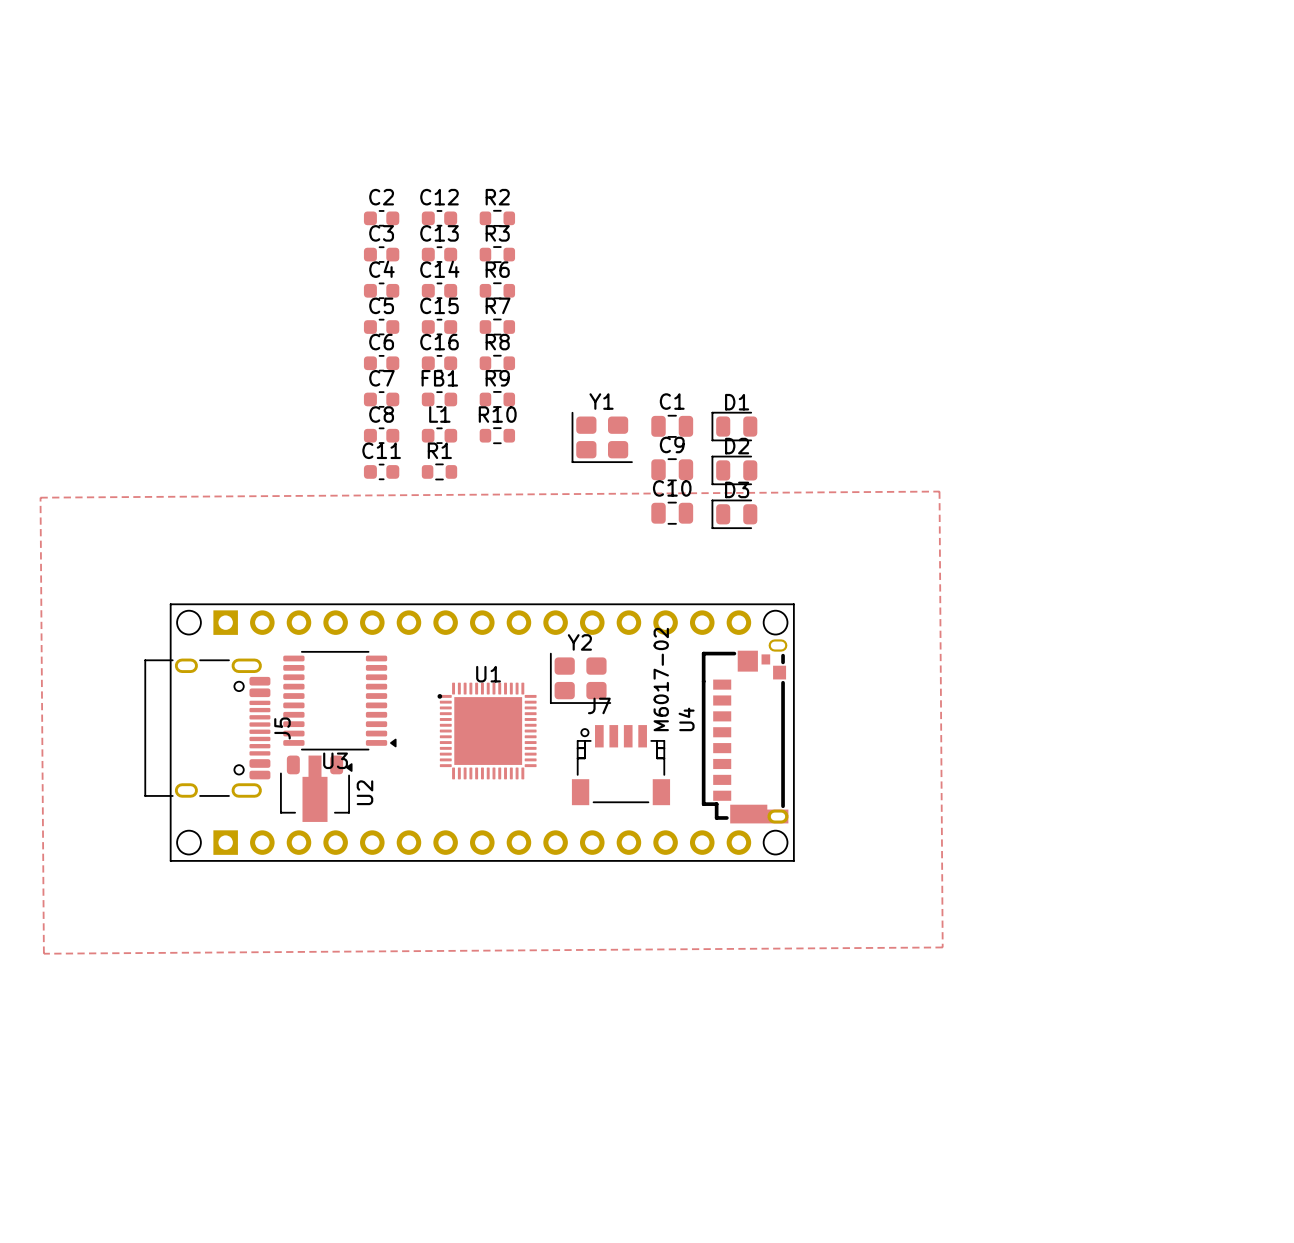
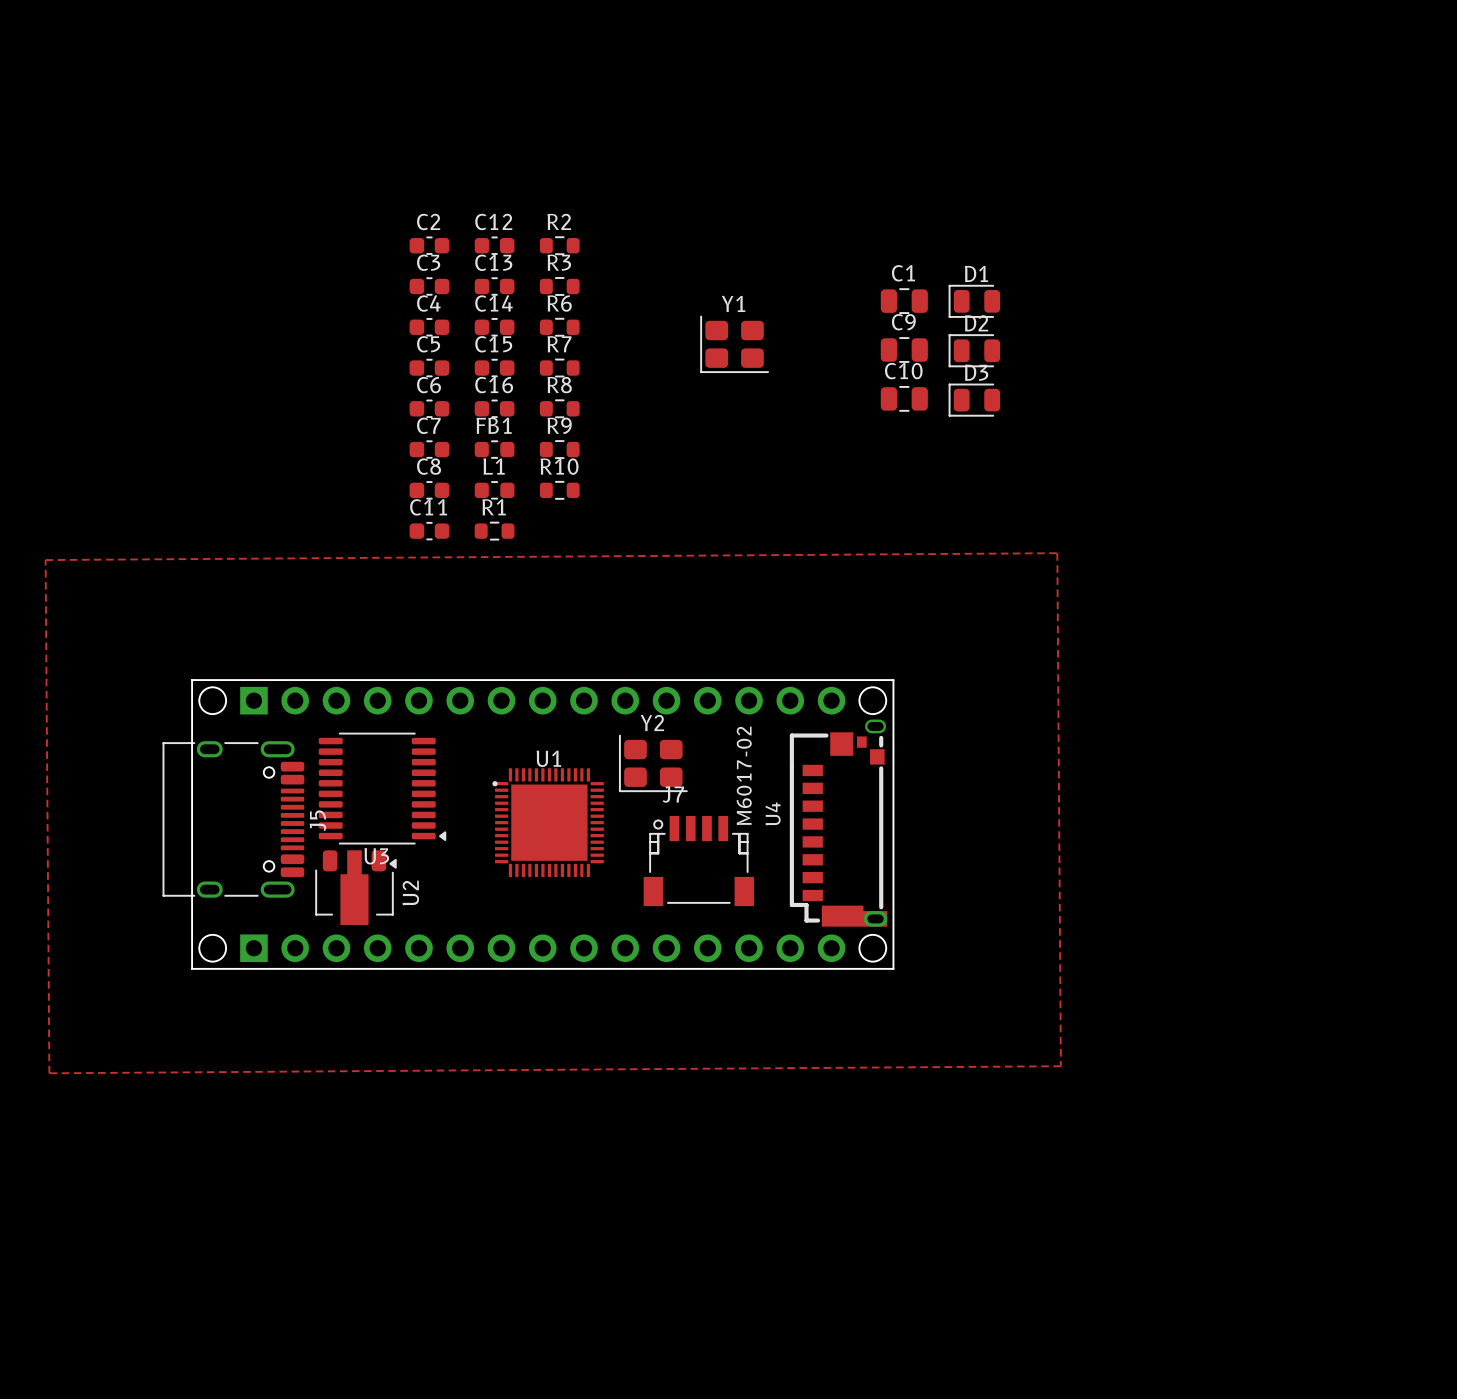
C1 position: (672, 426) -> (904, 301)
D1 position: (734, 426) -> (974, 301)
Y1 position: (602, 437) -> (734, 344)
C9 position: (672, 469) -> (904, 350)
D2 position: (734, 470) -> (974, 350)
C10 position: (672, 513) -> (904, 398)
D3 position: (734, 514) -> (974, 400)

